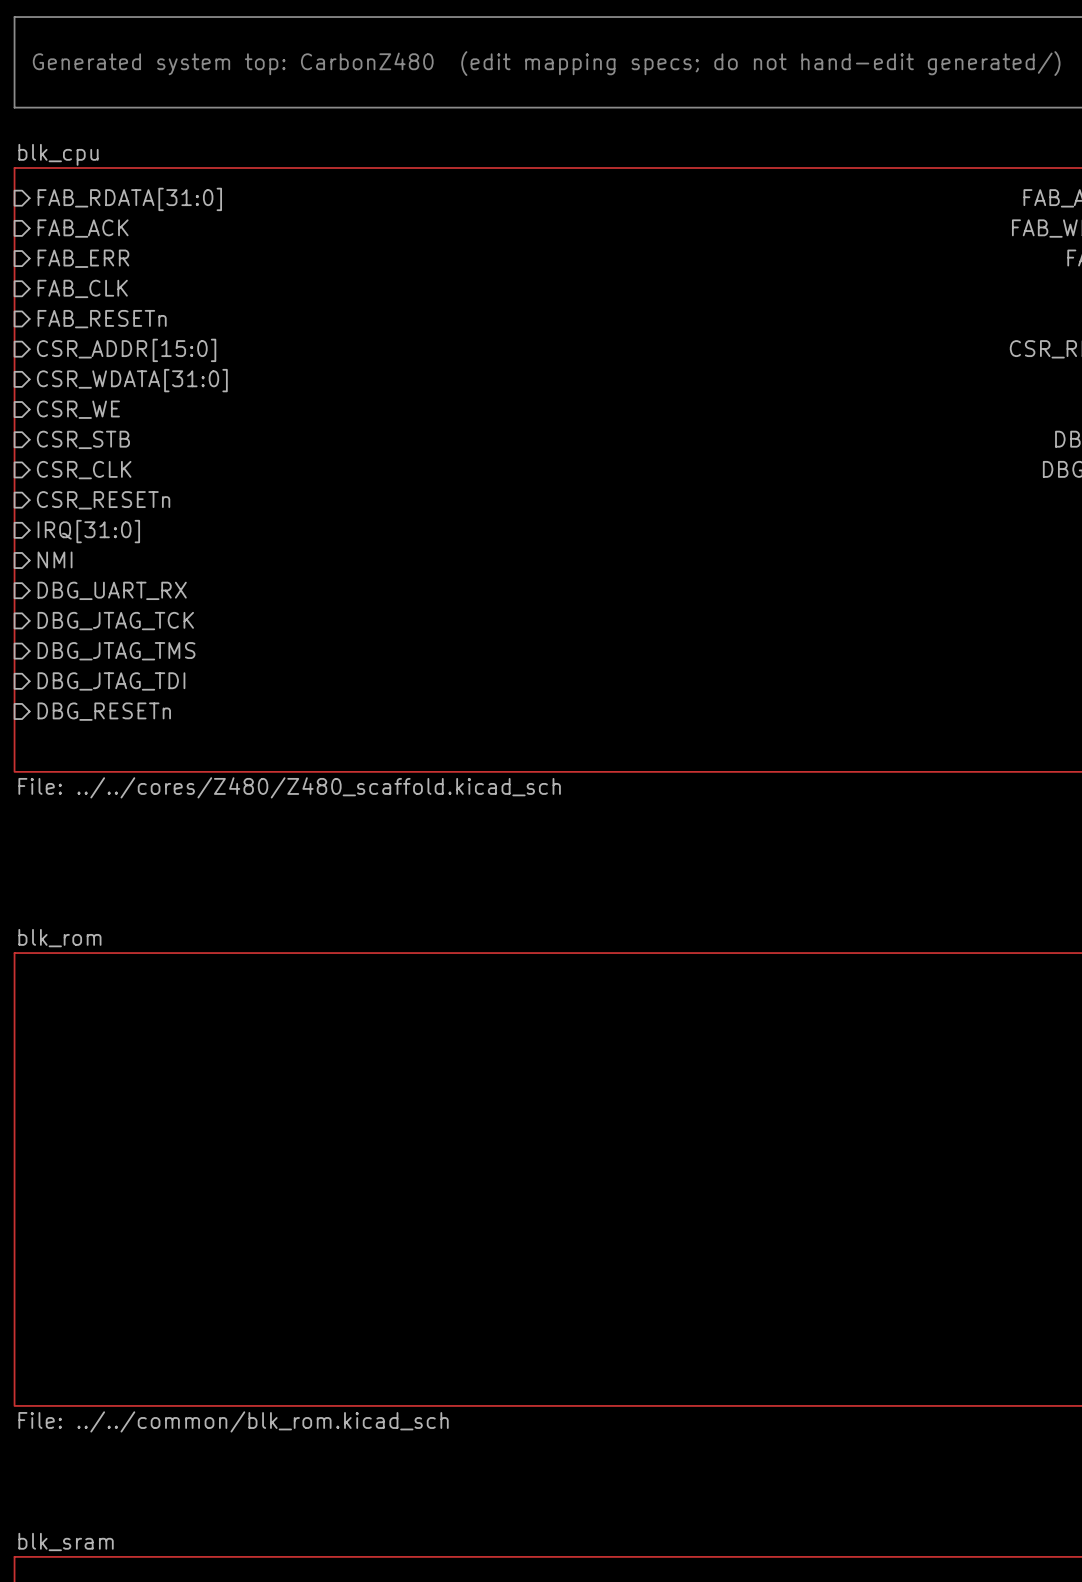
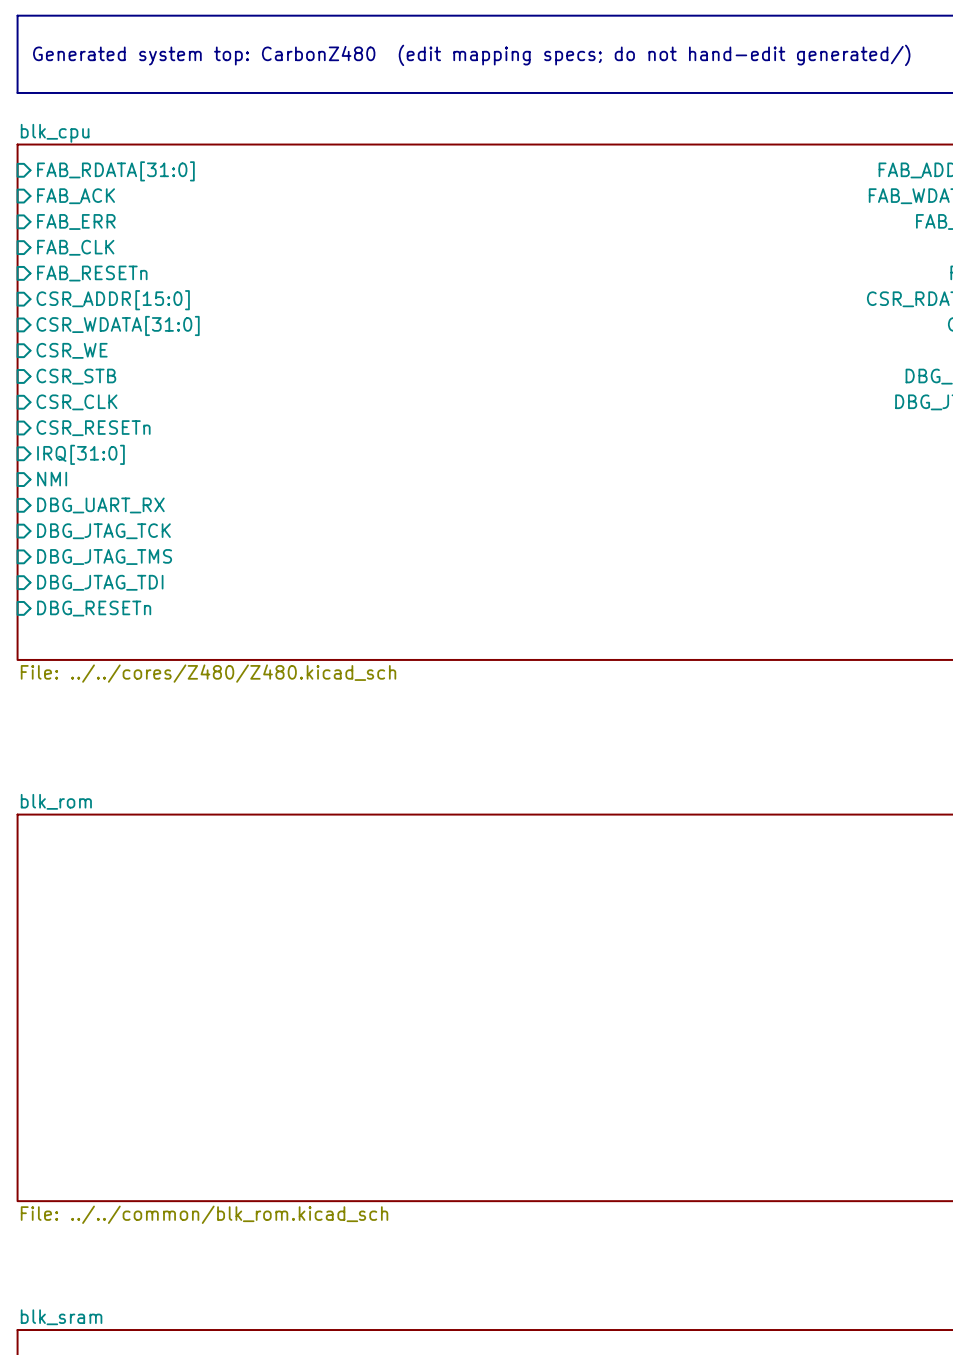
sheet blk_cpu value: File: ../../cores/Z480/Z480_scaffold.kicad_sch (289, 787) -> File: ../../cores/Z480/Z480.kicad_sch (208, 673)

